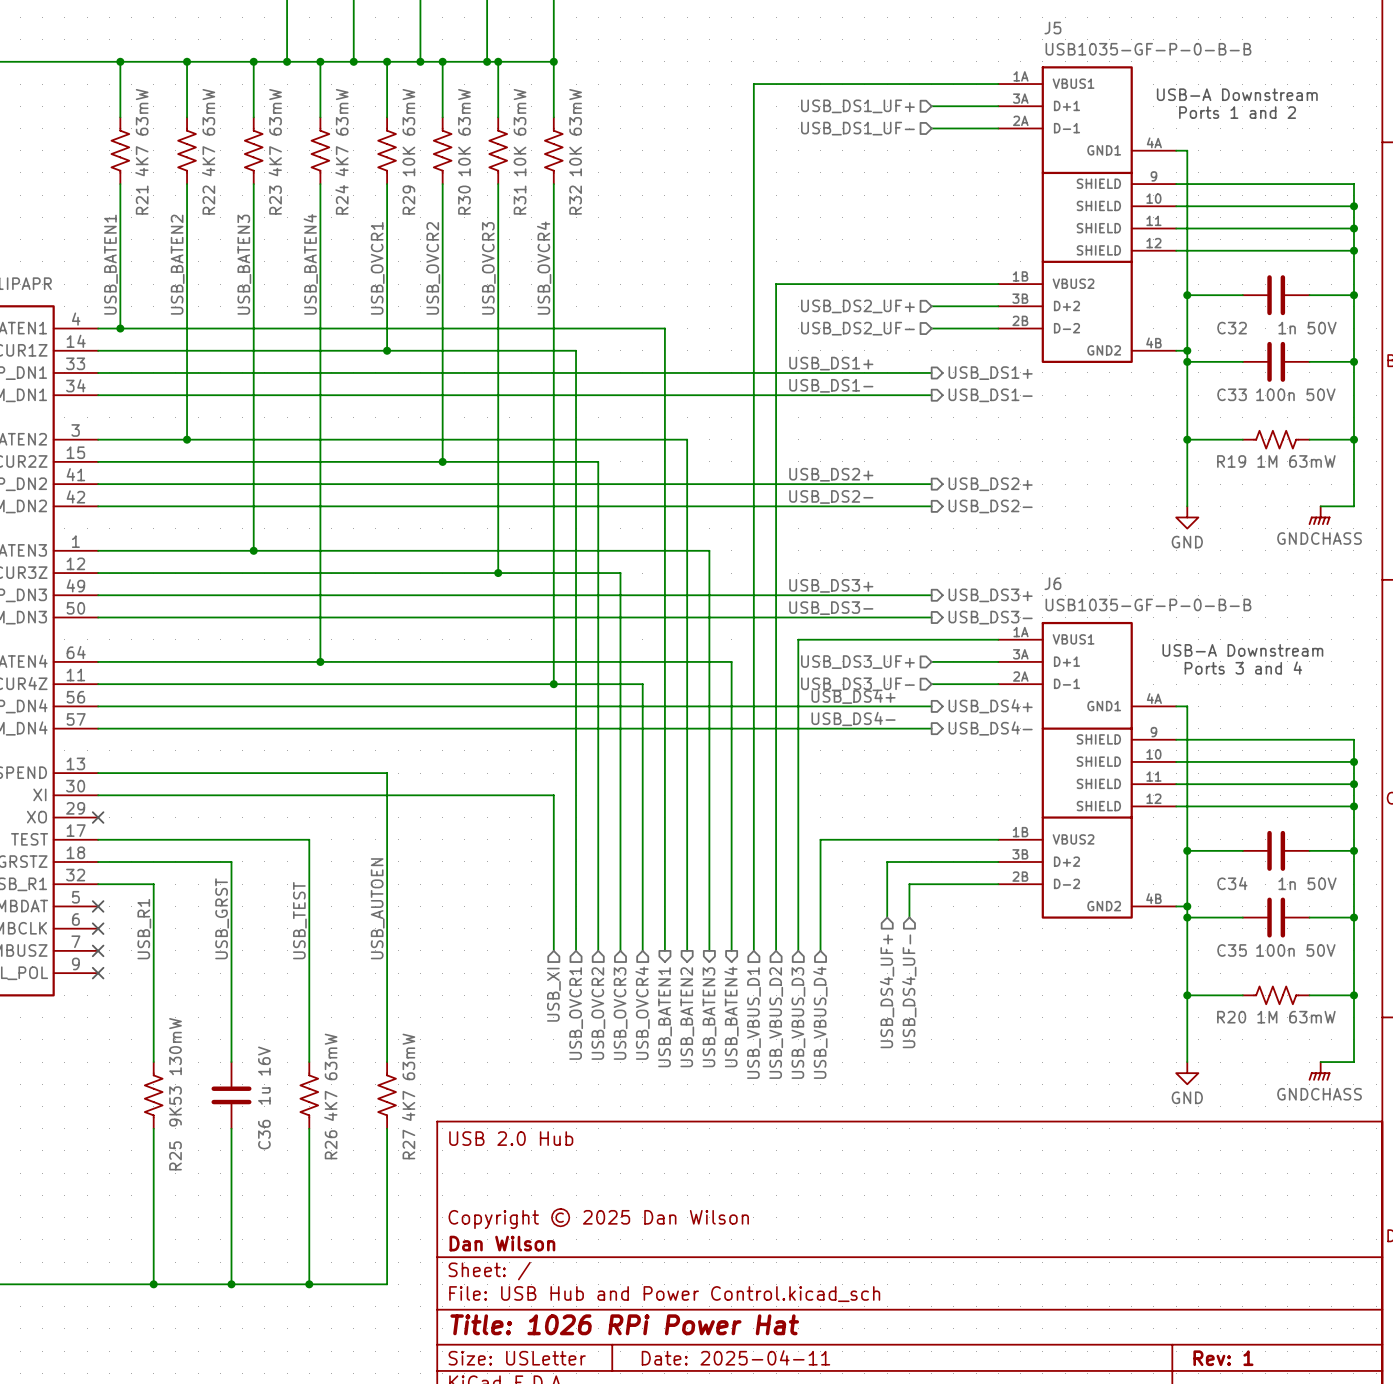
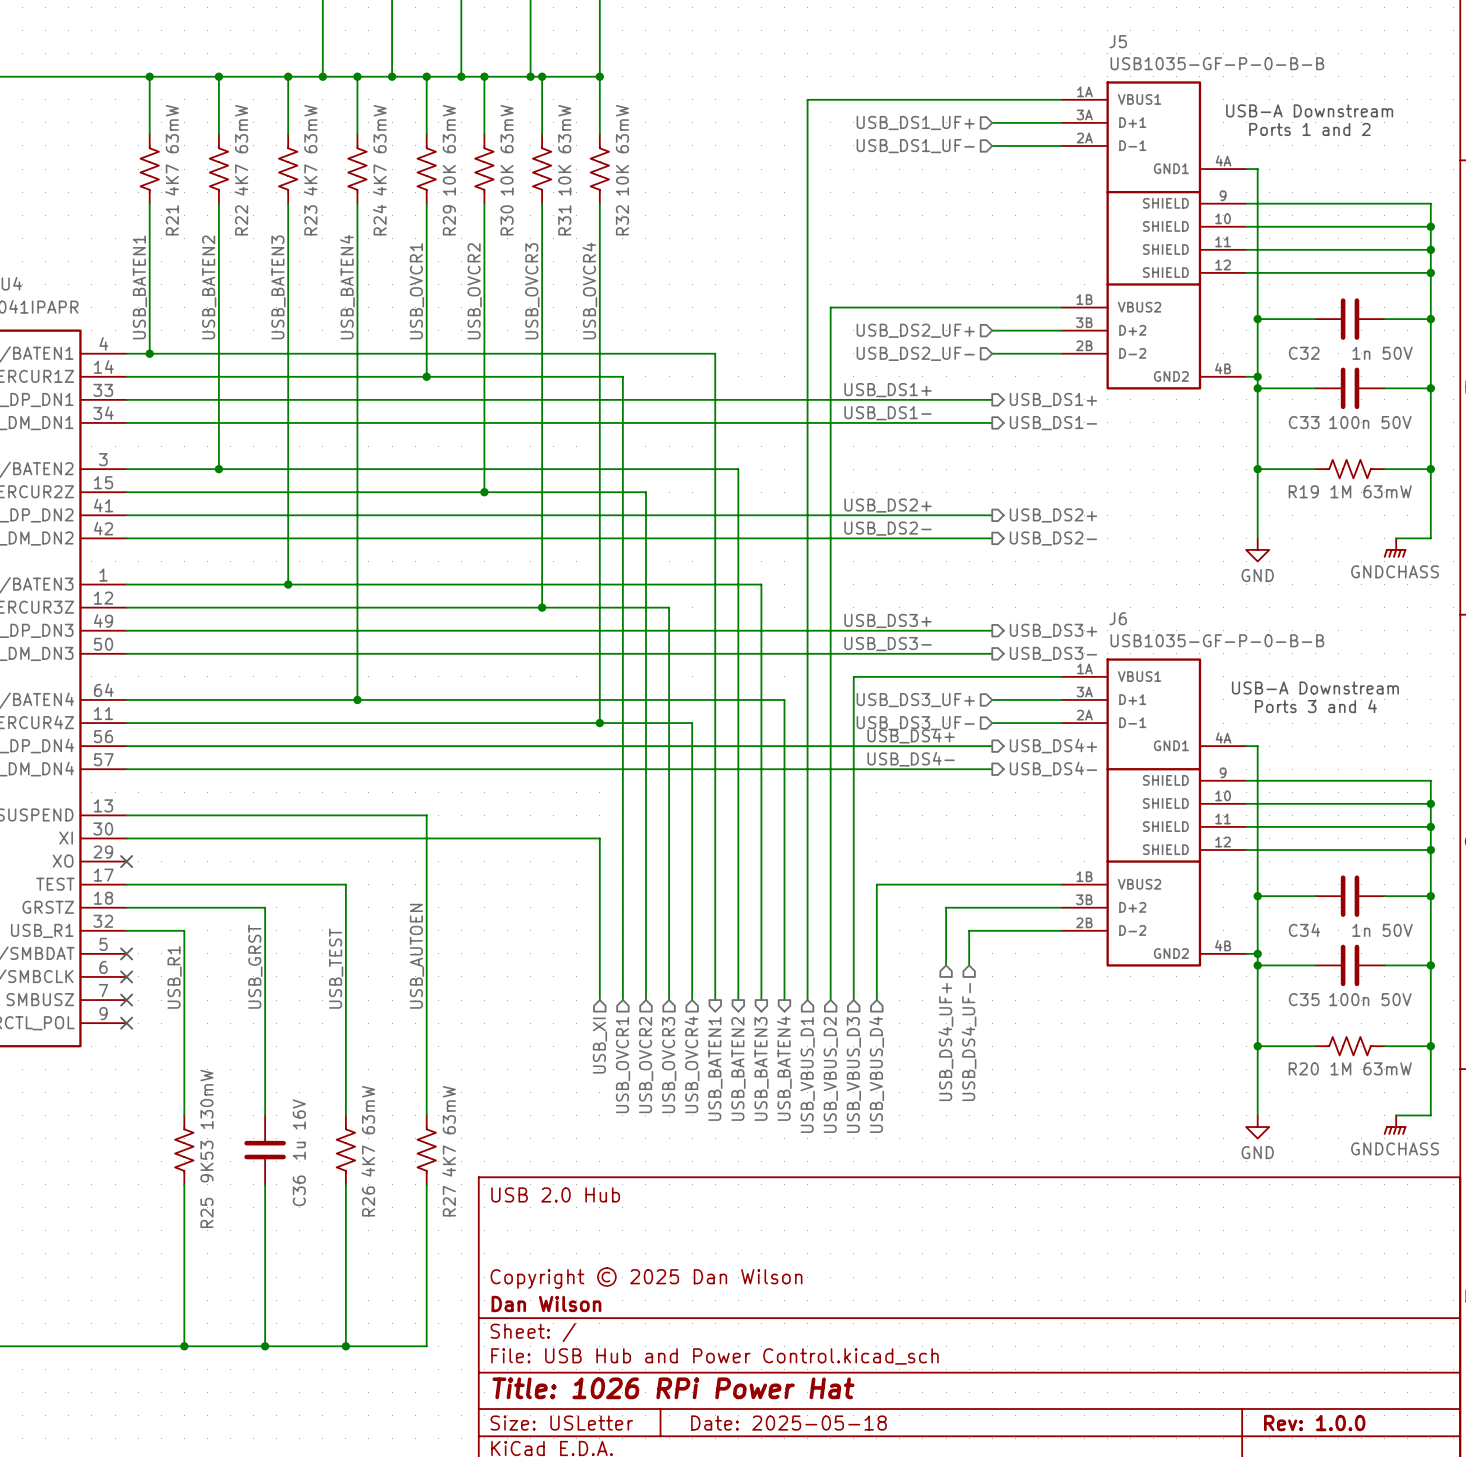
title block: Date: 2025-04-11 (735, 1357) -> Date: 2025-05-18 (789, 1423)
title block: Rev: 1 (1223, 1358) -> Rev: 1.0.0 (1314, 1423)

